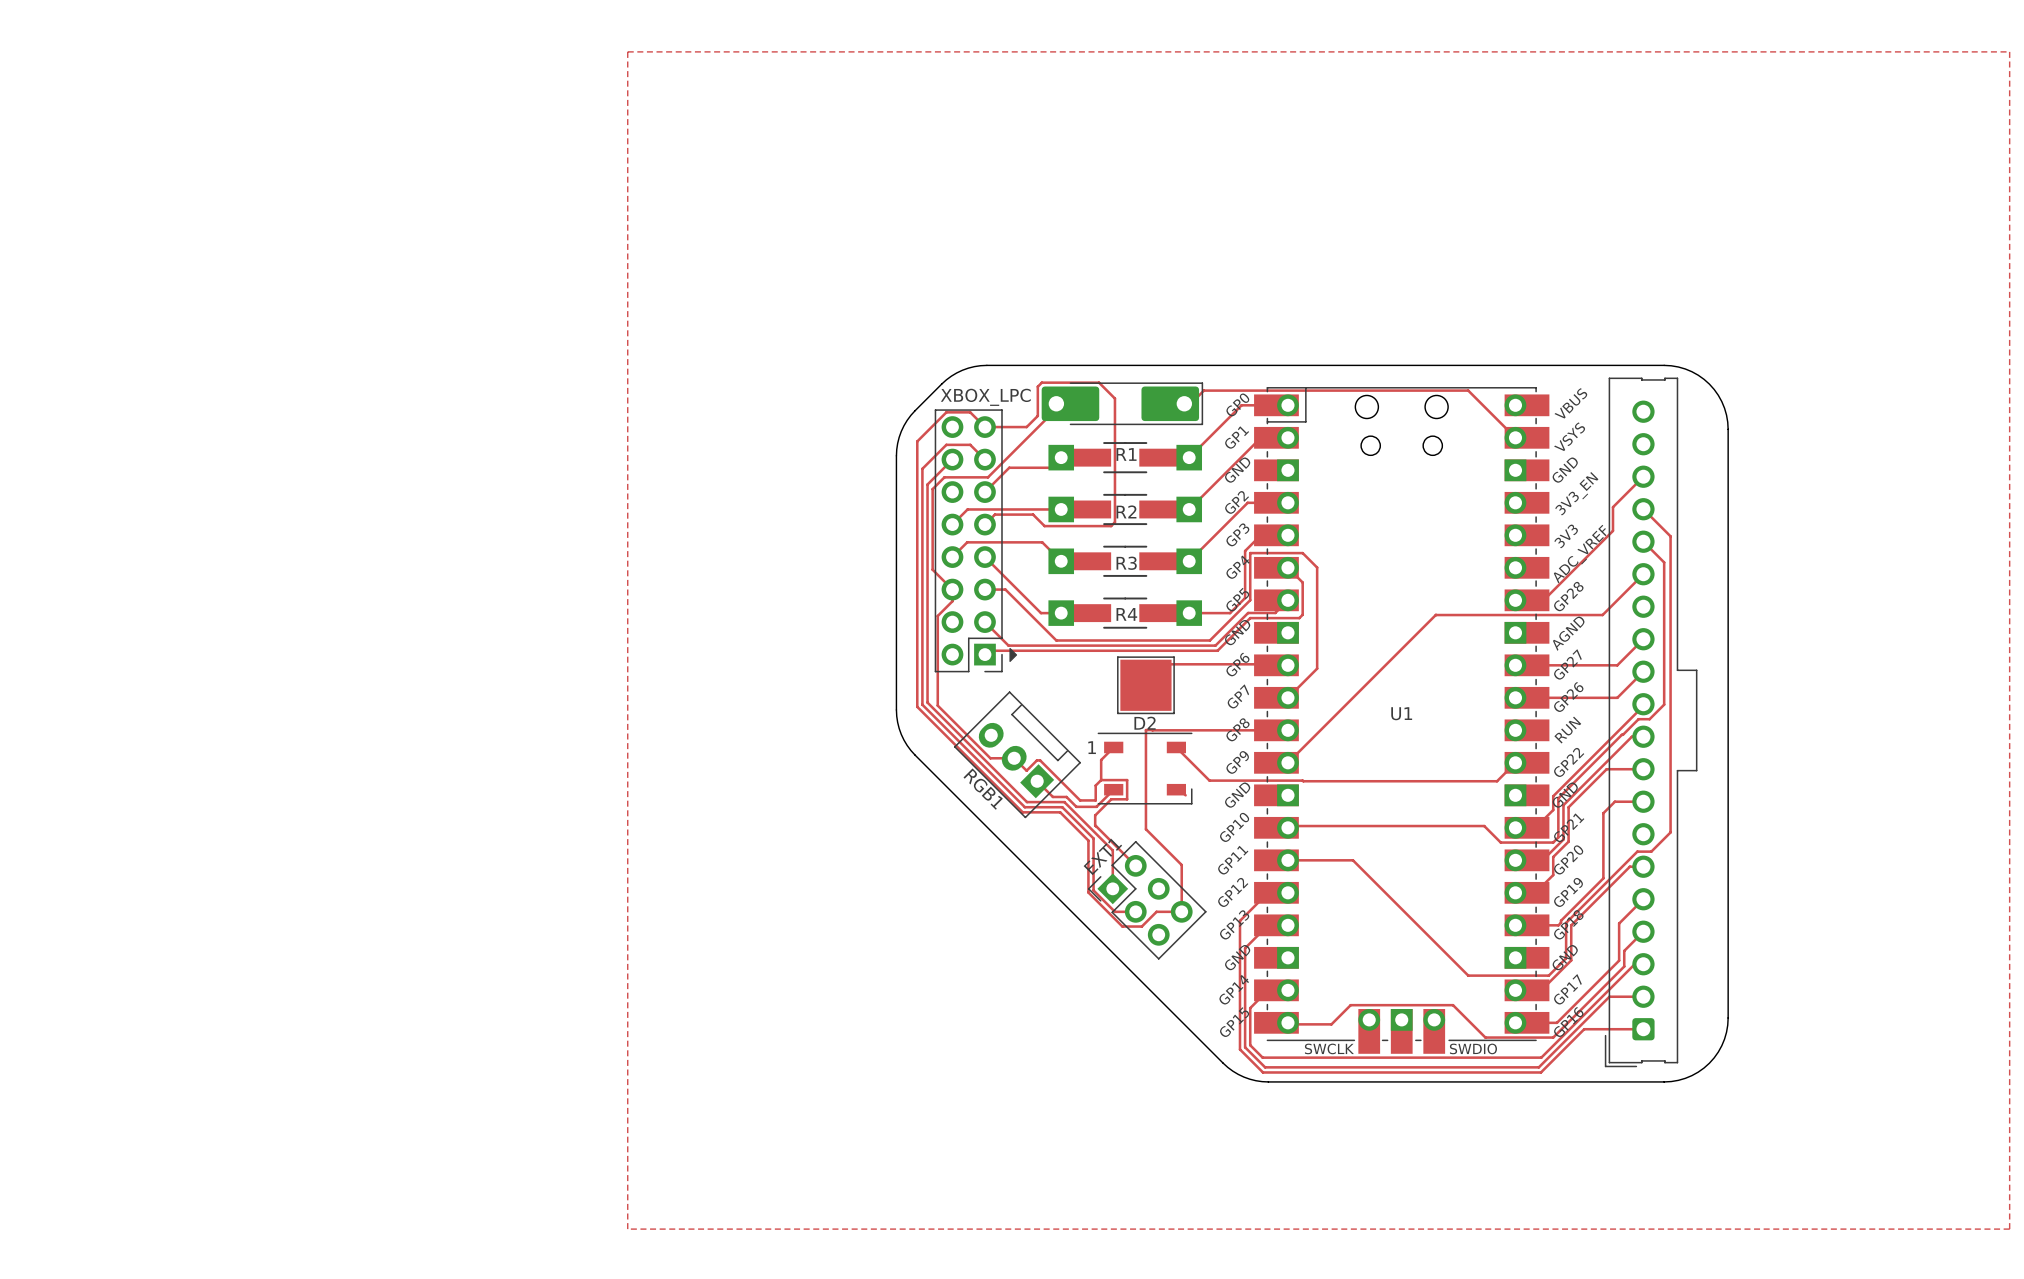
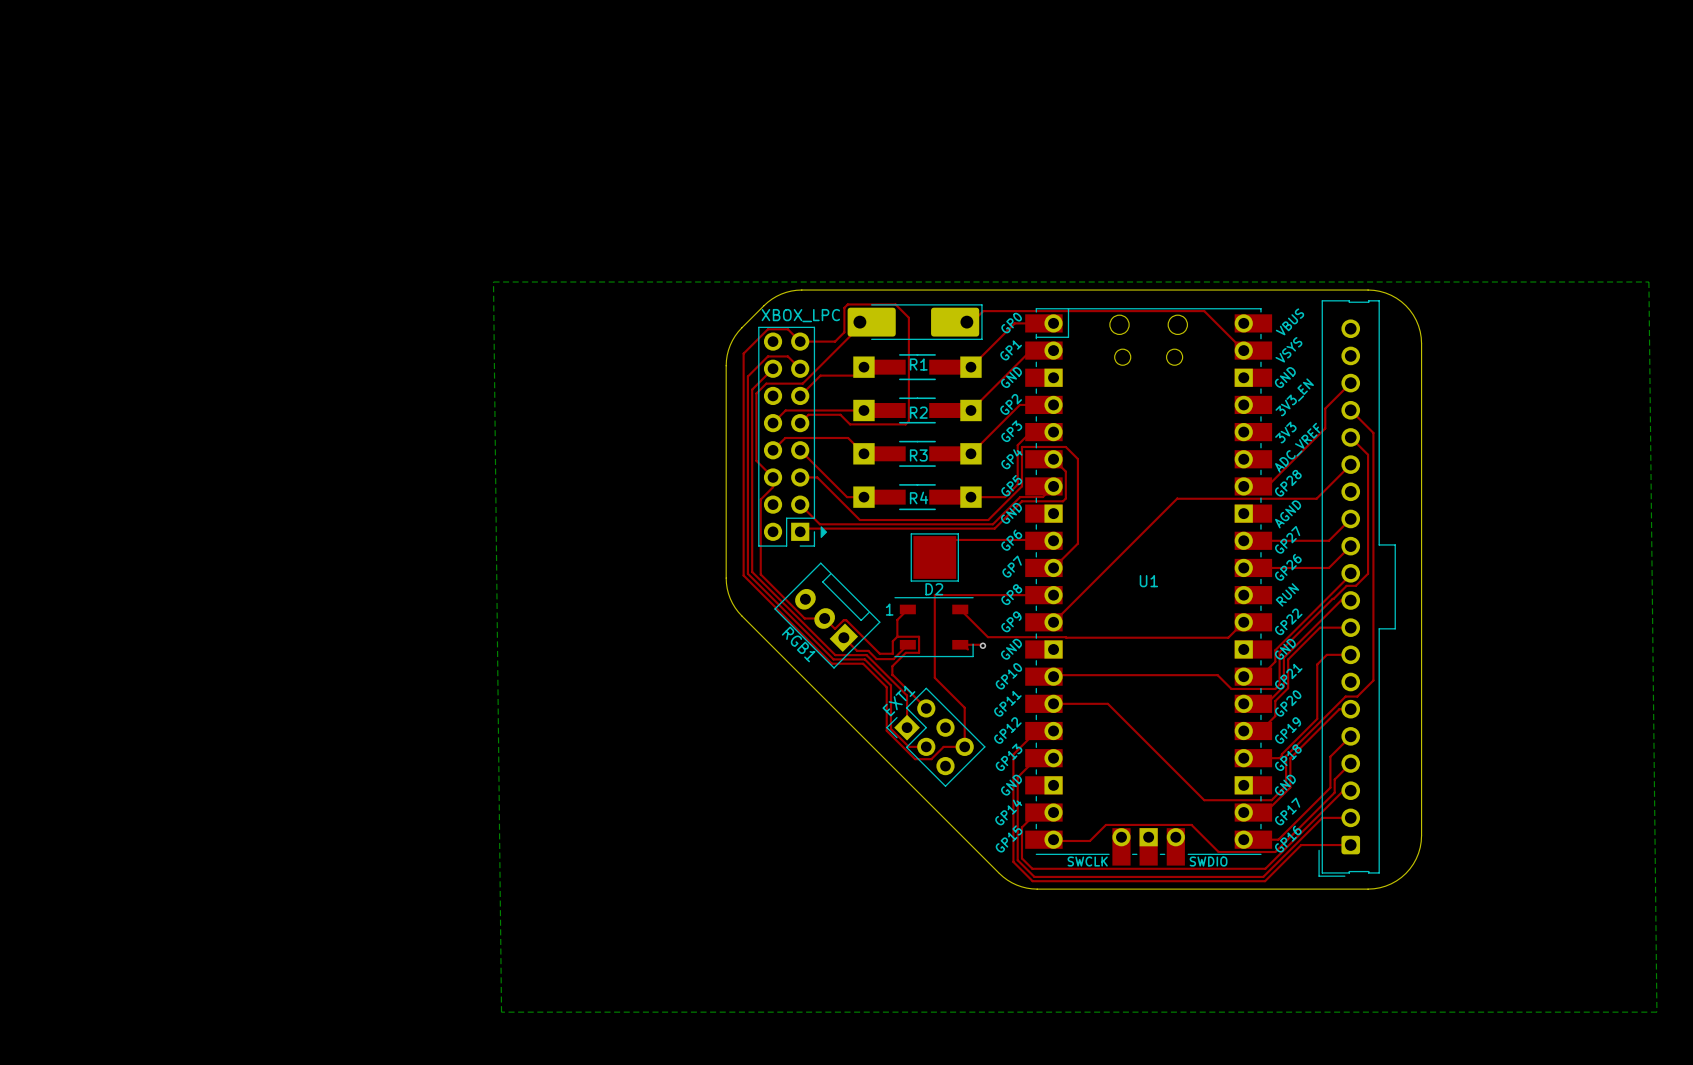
top zone outline: (627, 51) (2009, 51) (2009, 1229) (627, 1229) (627, 51) -> none
bottom zone outline: none -> (493, 282) (1648, 282) (1656, 1012) (501, 1012) (493, 282)
top track: none -> (963, 644) (982, 645)
via: none -> (982, 645)

